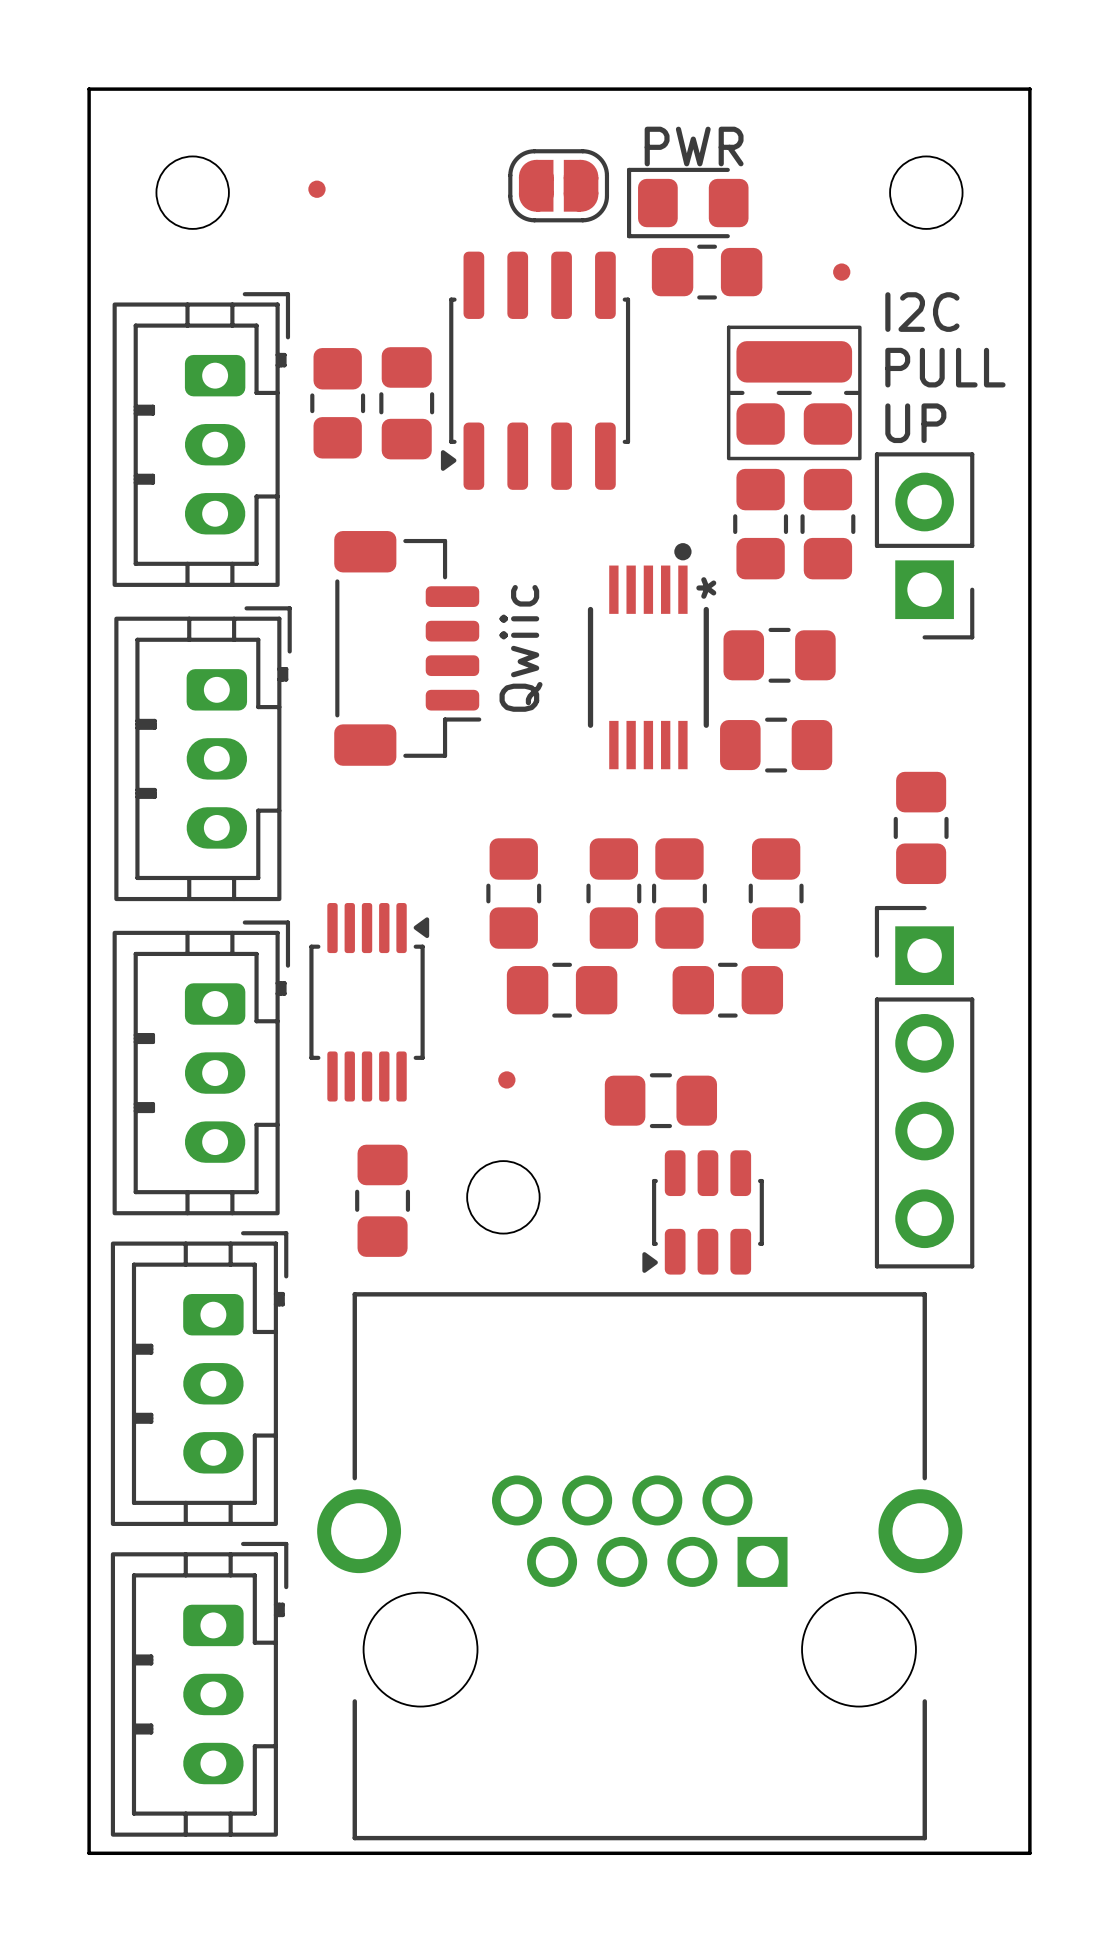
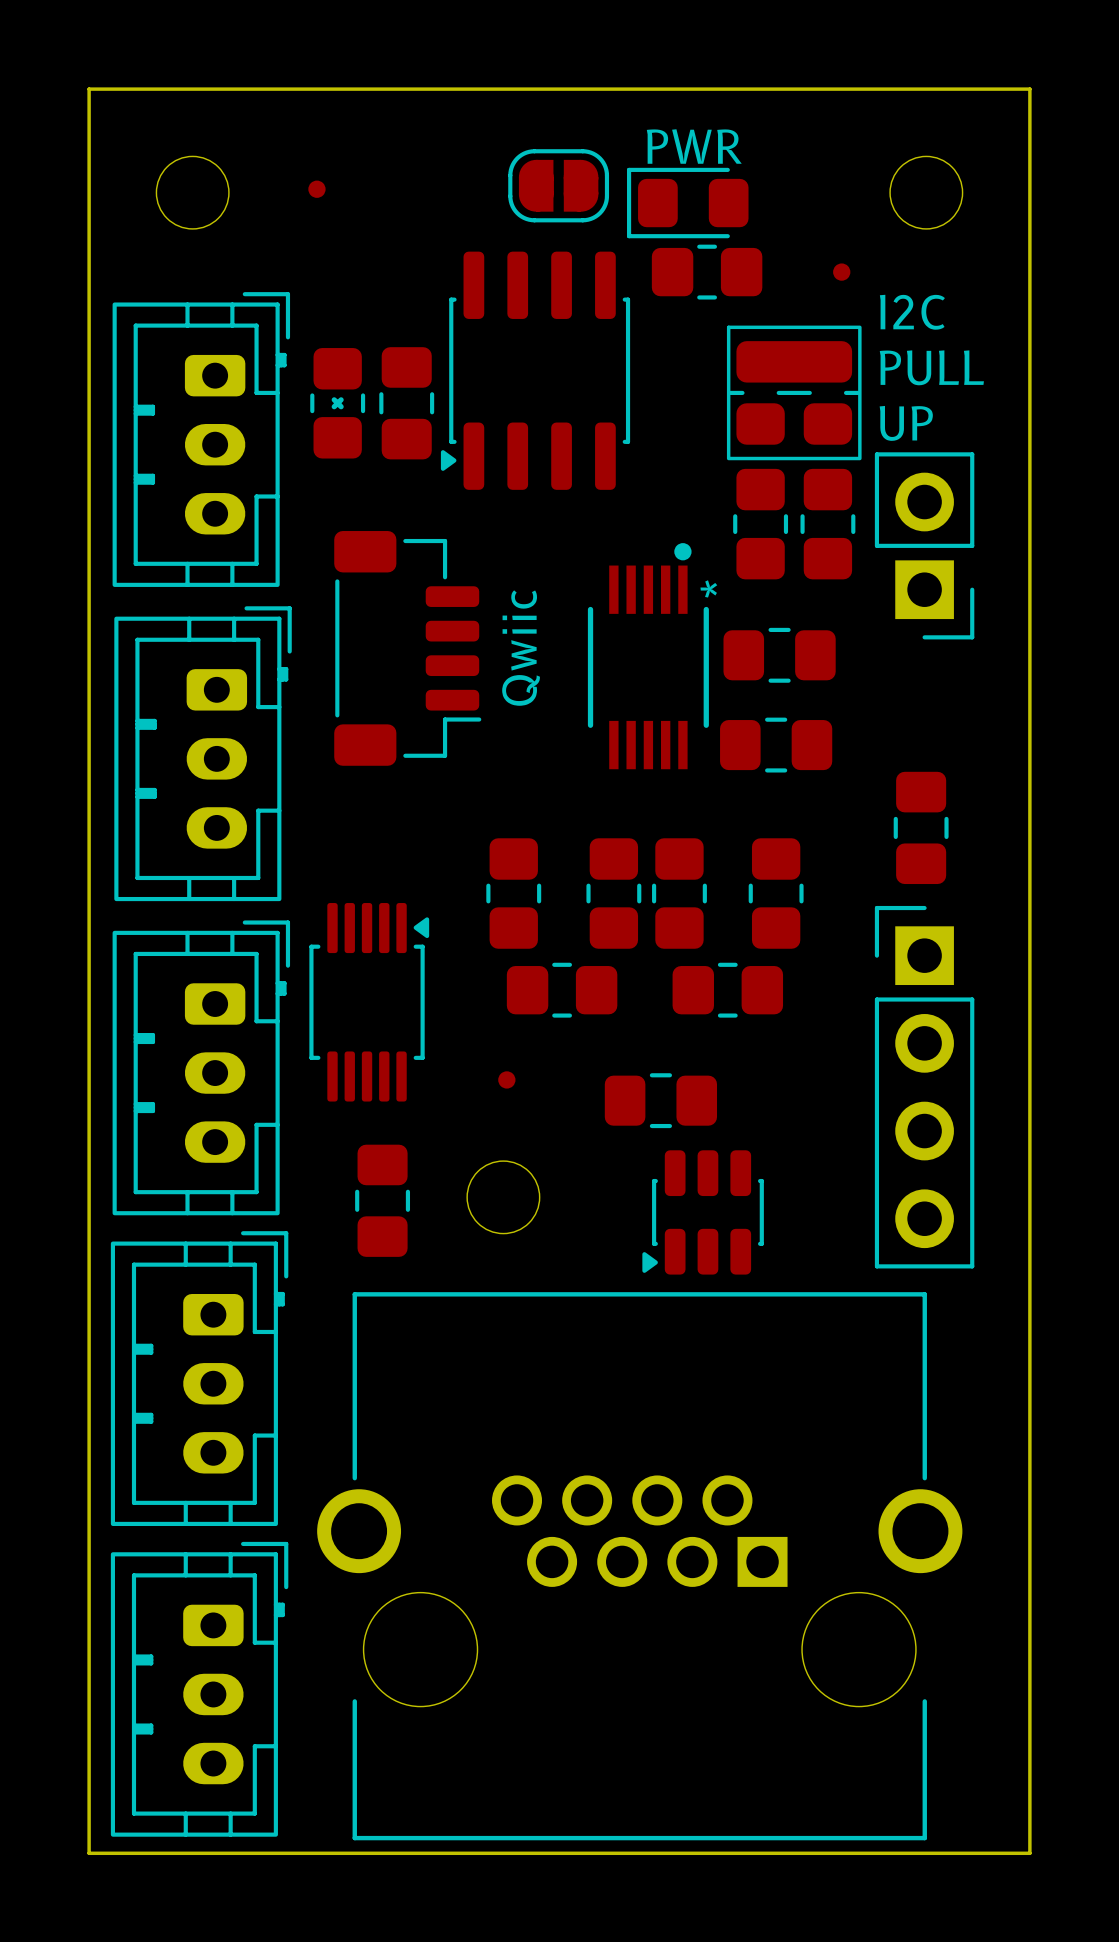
line: none -> (334, 399) (341, 406)
line: none -> (341, 399) (334, 406)

